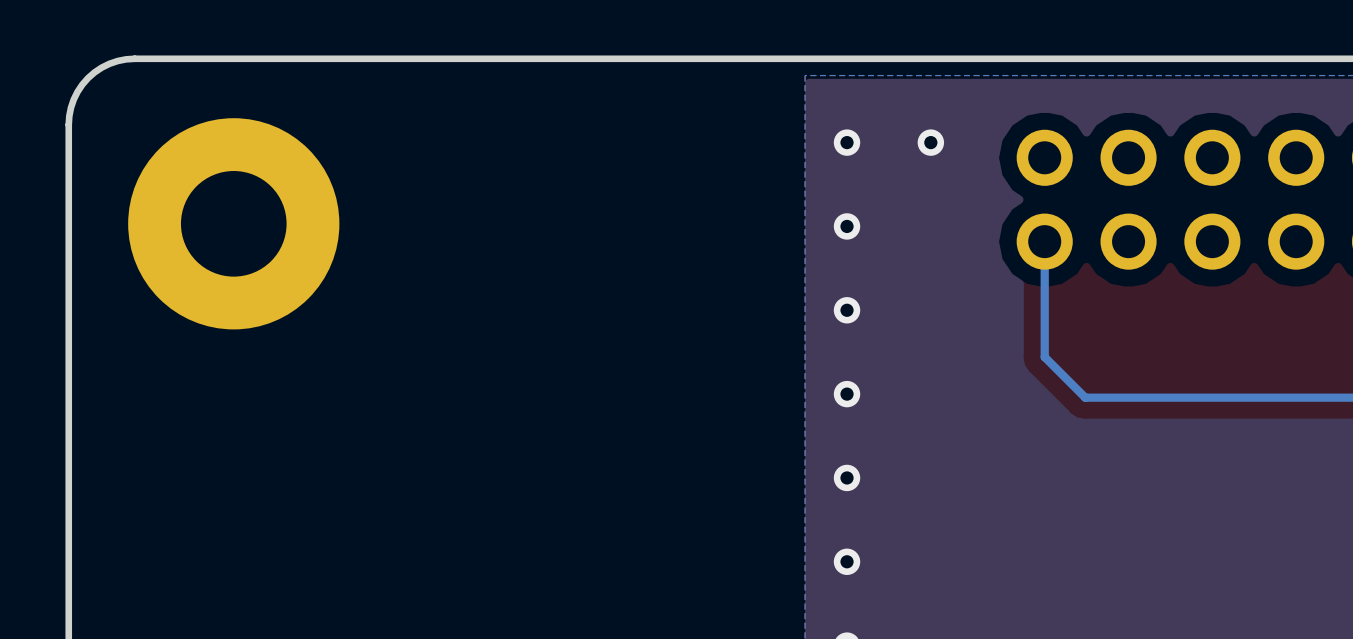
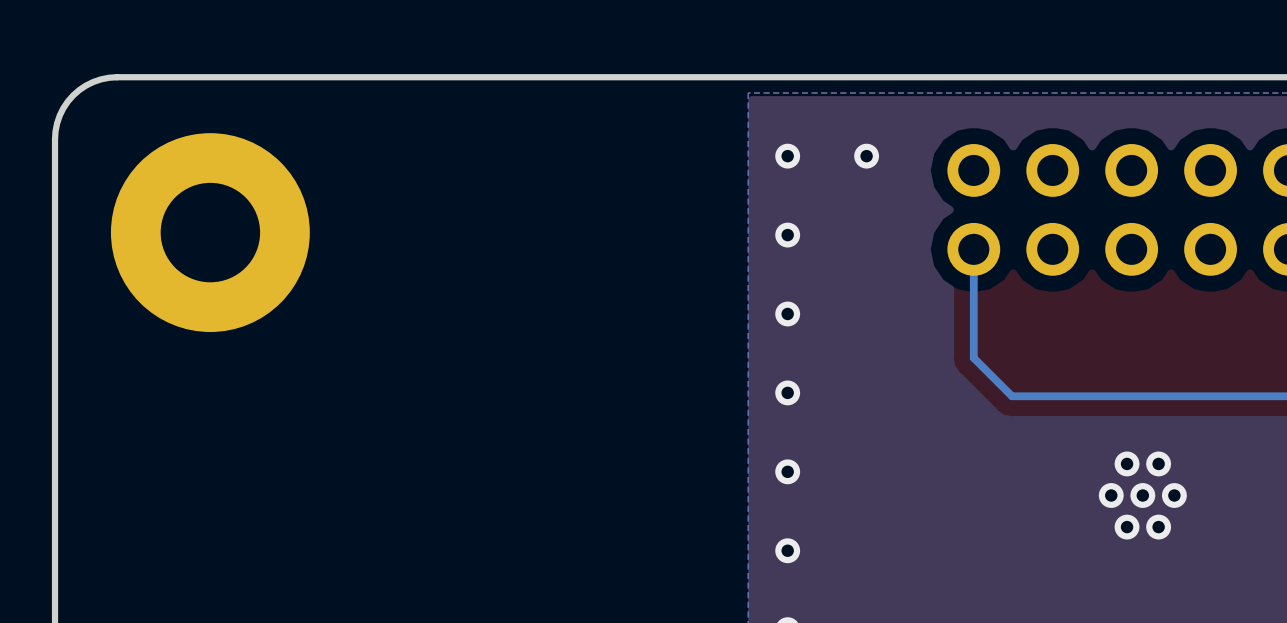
via: none -> (1127, 463)
via: none -> (1158, 463)
via: none -> (1111, 495)
via: none -> (1142, 495)
via: none -> (1174, 495)
via: none -> (1127, 527)
via: none -> (1158, 527)

